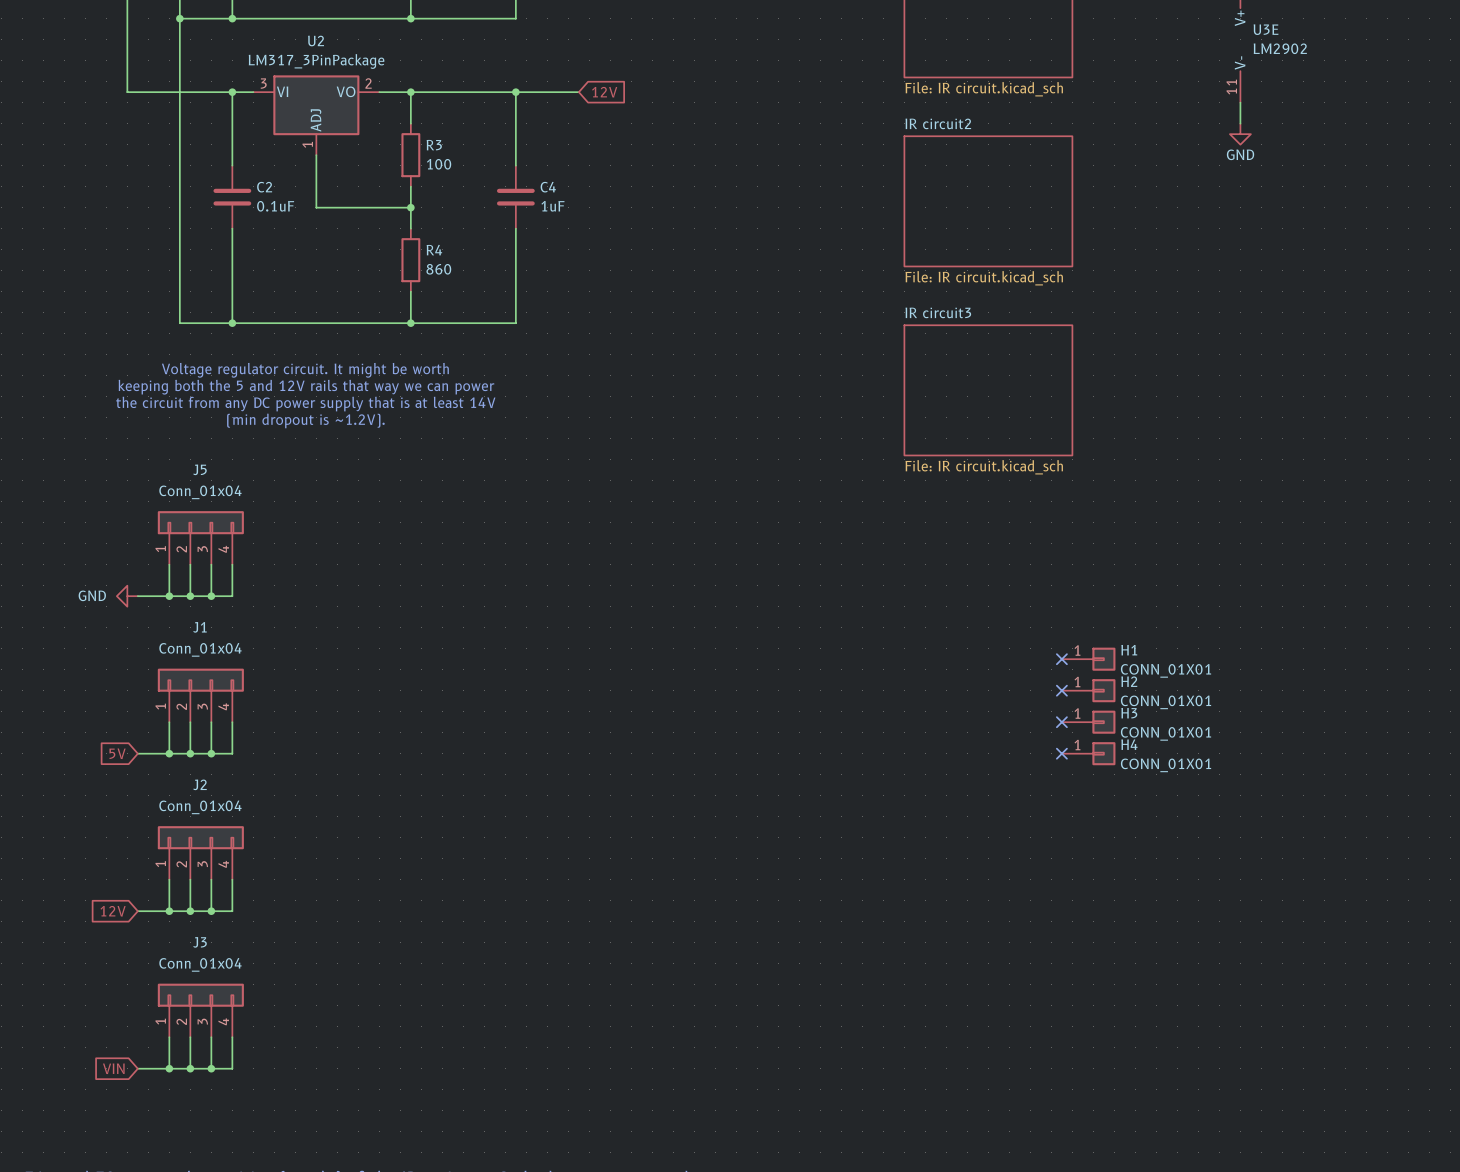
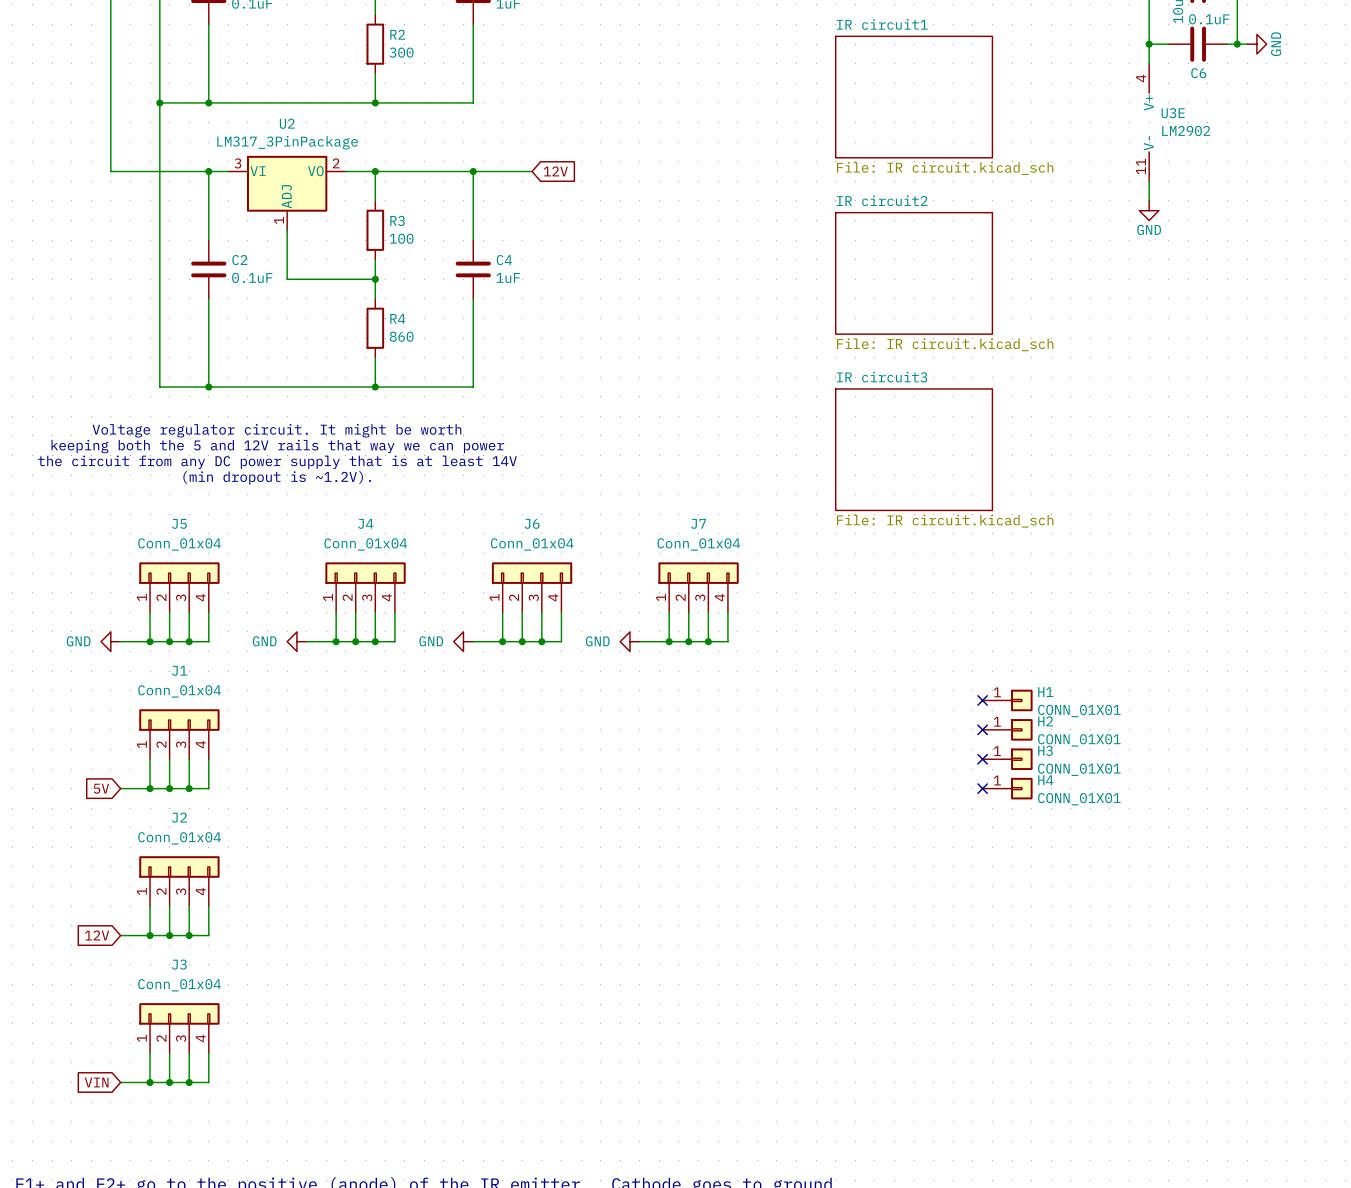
J4: none -> Conn_01x04 (365, 587)
J6: none -> Conn_01x04 (532, 587)
J7: none -> Conn_01x04 (698, 587)
wire: none -> (336, 612) (336, 641)
wire: none -> (355, 612) (355, 641)
wire: none -> (375, 612) (375, 641)
wire: none -> (394, 612) (394, 641) (306, 641)
wire: none -> (502, 612) (502, 641)
wire: none -> (522, 612) (522, 641)
wire: none -> (541, 612) (541, 641)
wire: none -> (561, 612) (561, 641) (473, 641)
wire: none -> (669, 612) (669, 641)
wire: none -> (688, 612) (688, 641)
wire: none -> (708, 612) (708, 641)
wire: none -> (727, 612) (727, 641) (639, 641)
power symbol: none -> GND (296, 641)
junction: none -> (336, 641)
junction: none -> (355, 641)
junction: none -> (375, 641)
power symbol: none -> GND (463, 641)
junction: none -> (502, 641)
junction: none -> (522, 641)
junction: none -> (541, 641)
power symbol: none -> GND (630, 641)
junction: none -> (669, 641)
junction: none -> (688, 641)
junction: none -> (708, 641)

